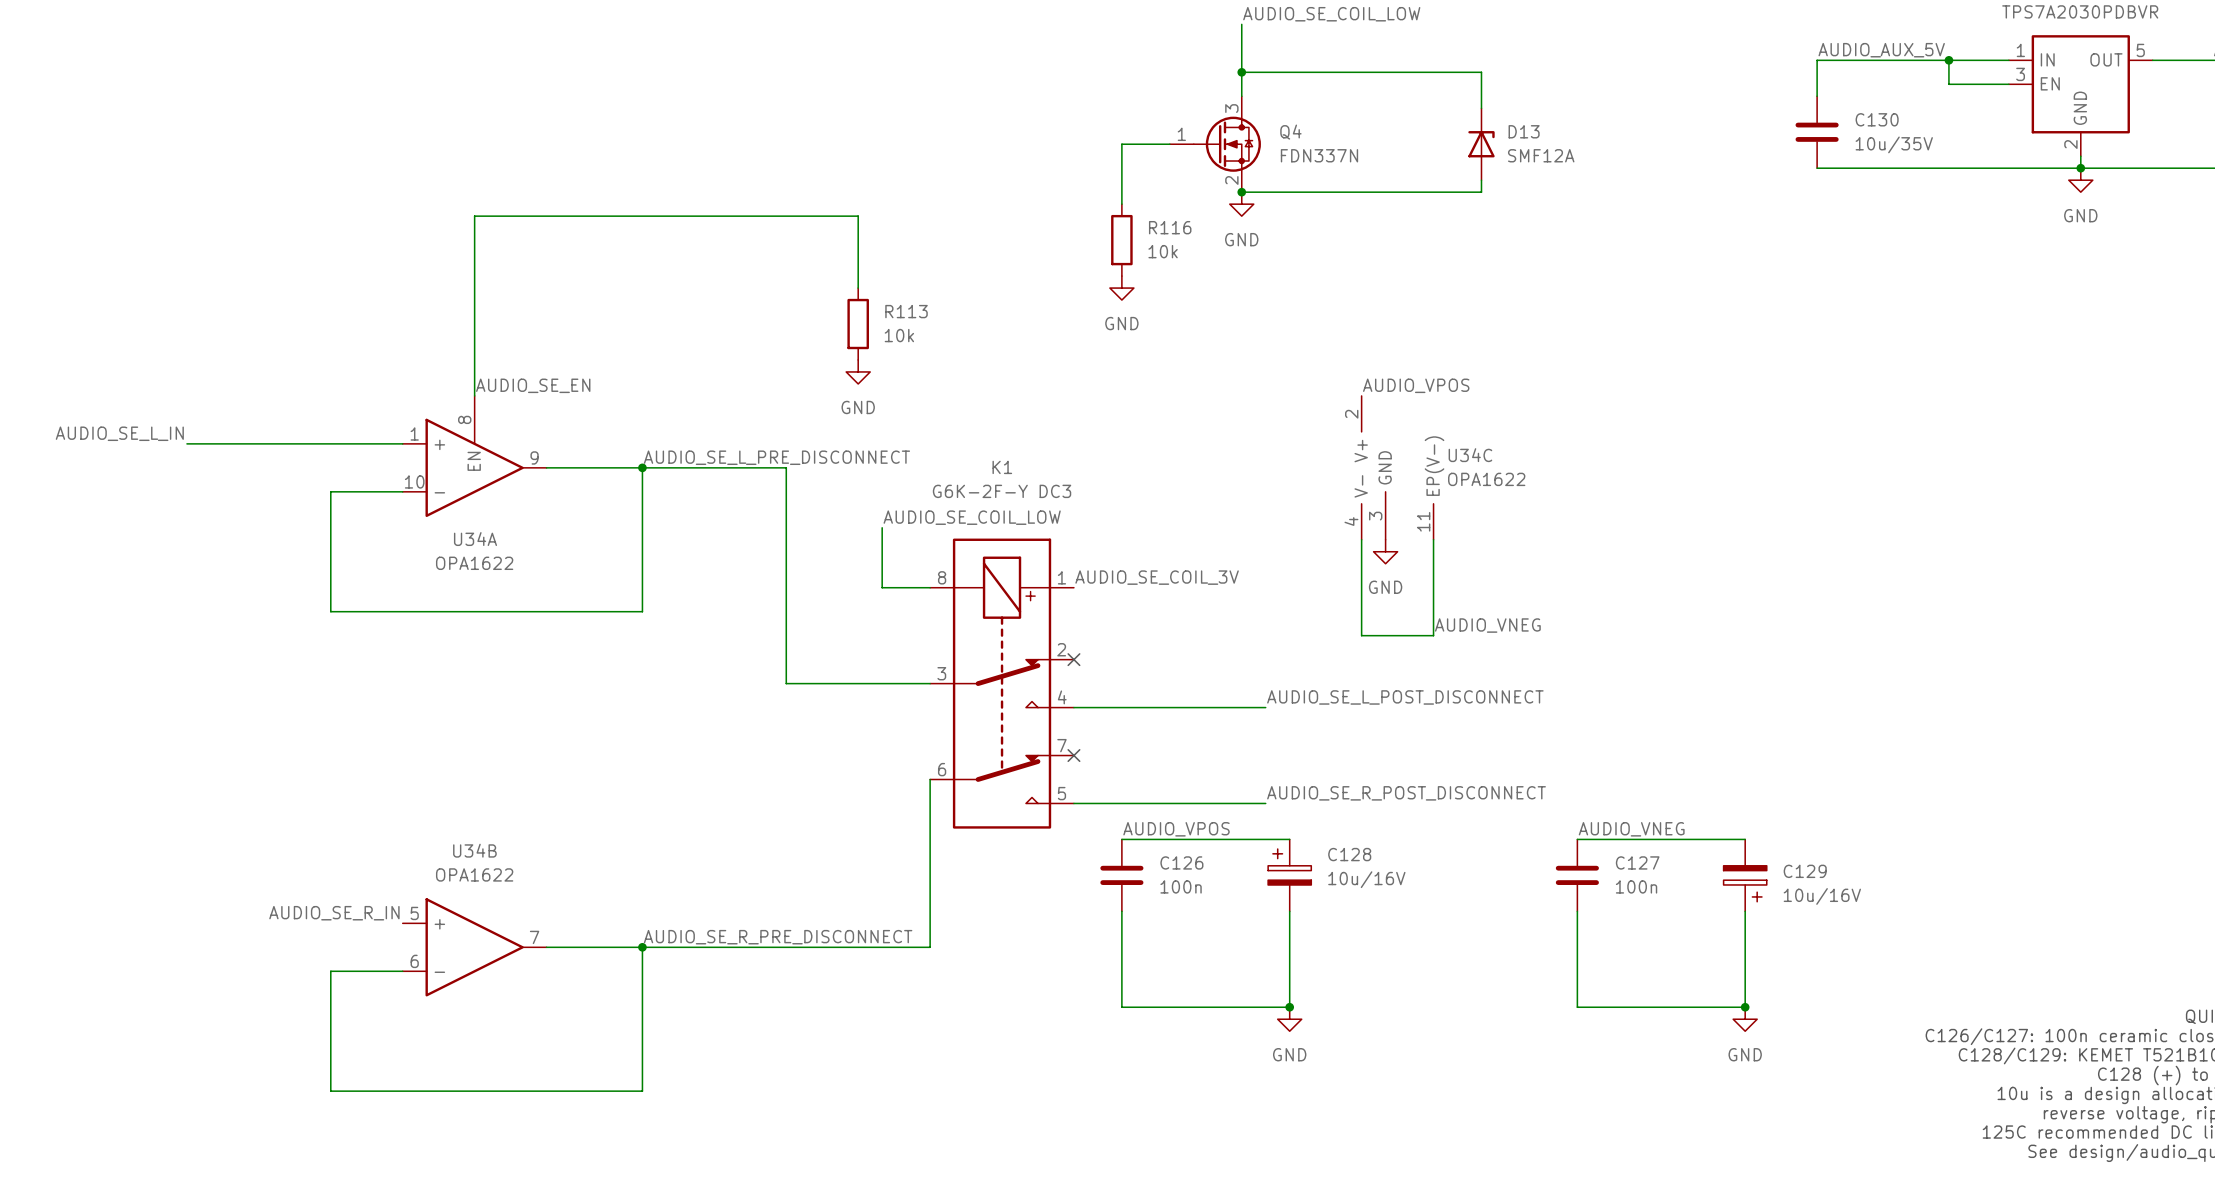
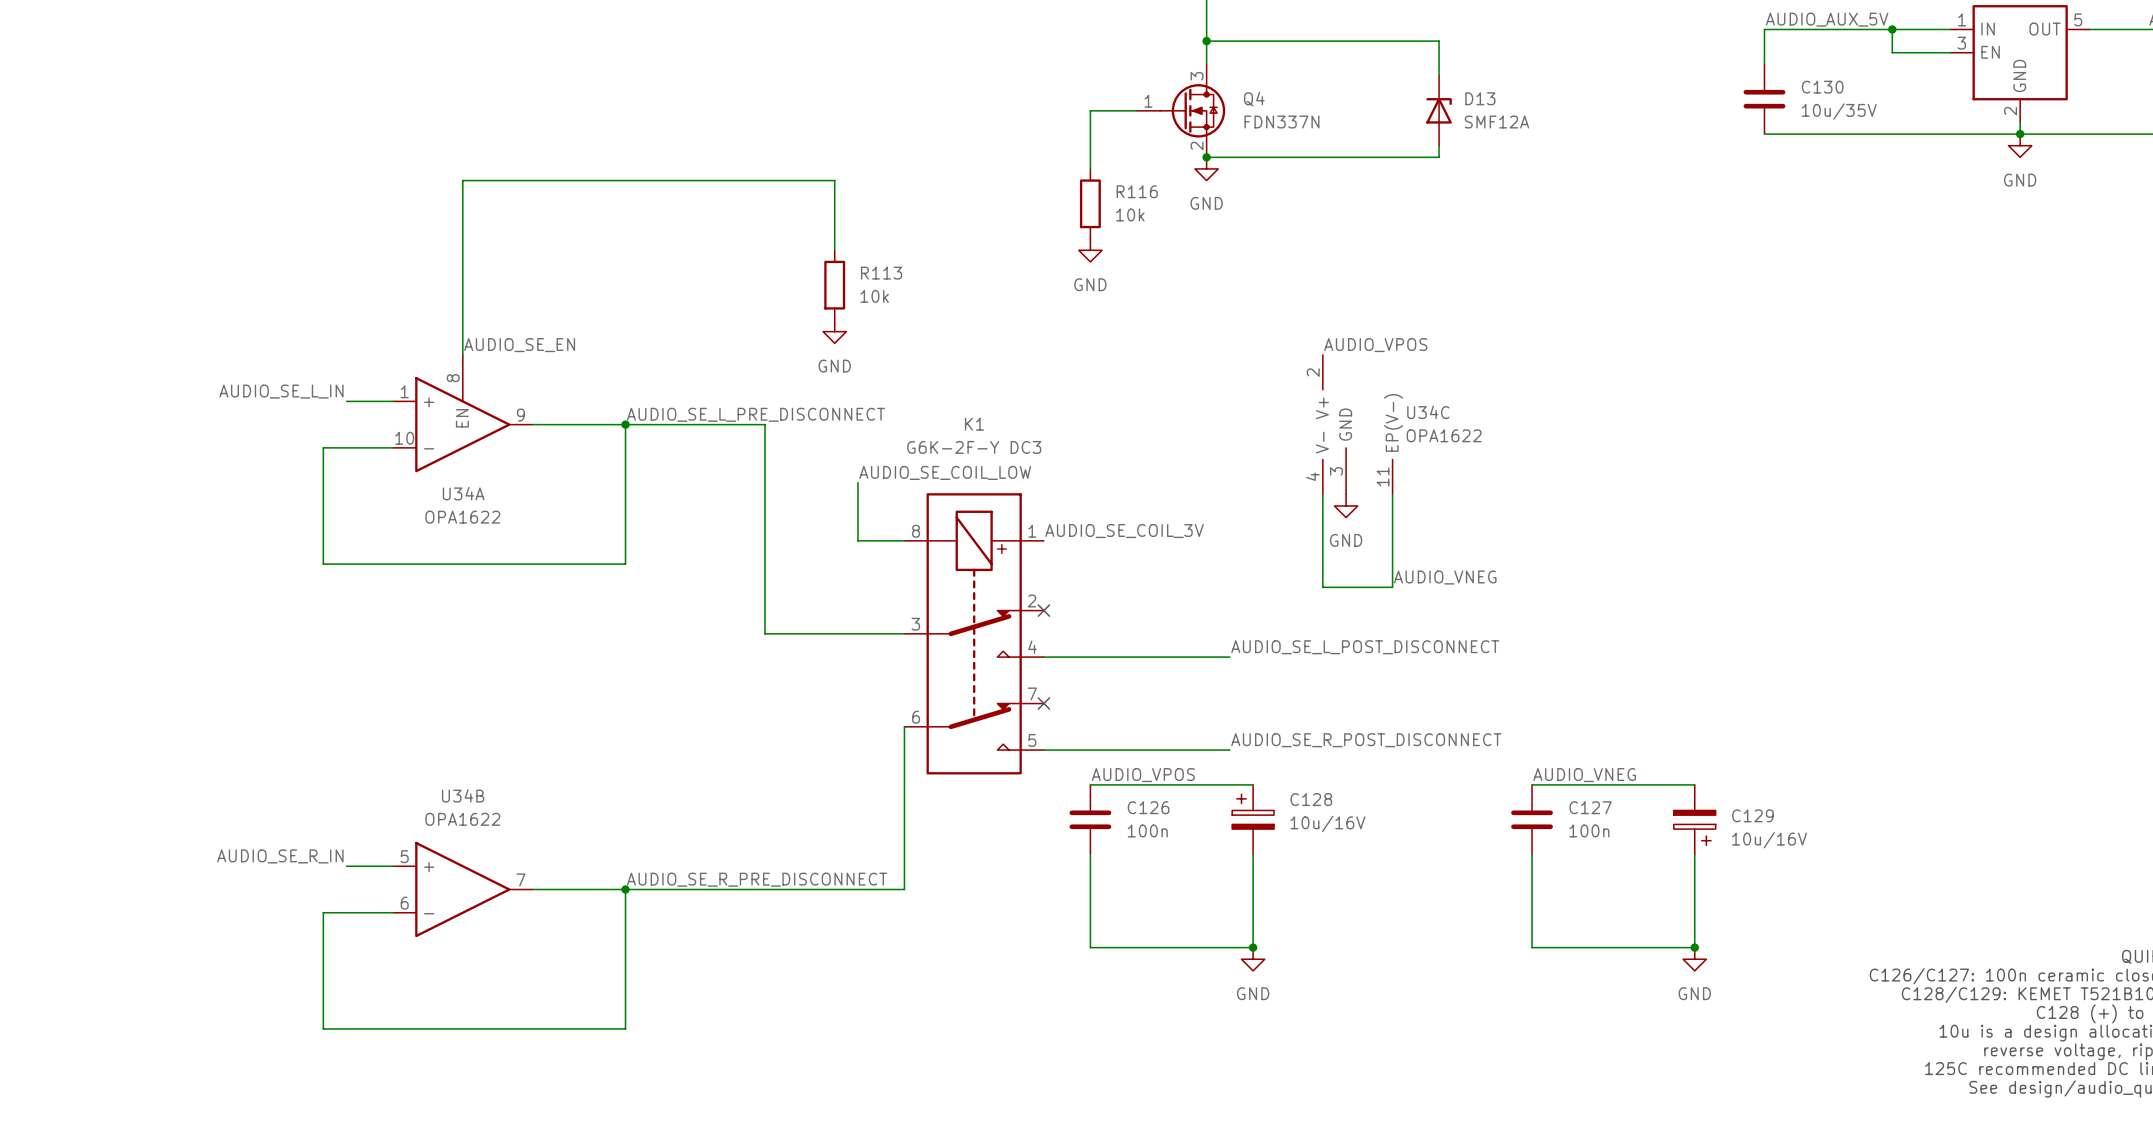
label position: AUDIO_SE_L_IN (119, 433) -> AUDIO_SE_L_IN (281, 391)
wire: (186, 443) (354, 443) -> none
label position: AUDIO_SE_R_IN (334, 913) -> AUDIO_SE_R_IN (280, 856)
wire: none -> (346, 866) (393, 866)

